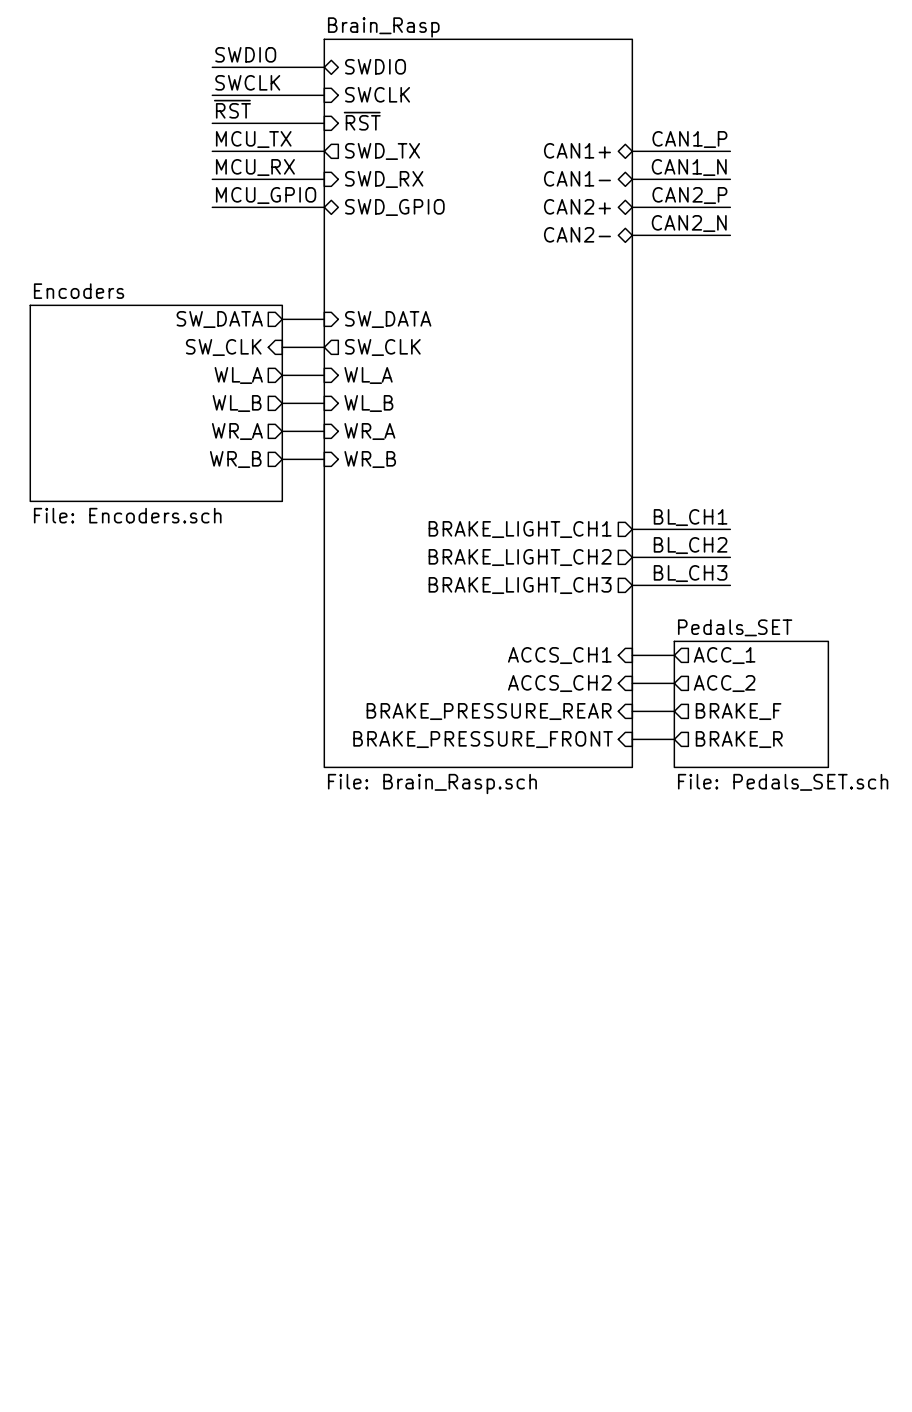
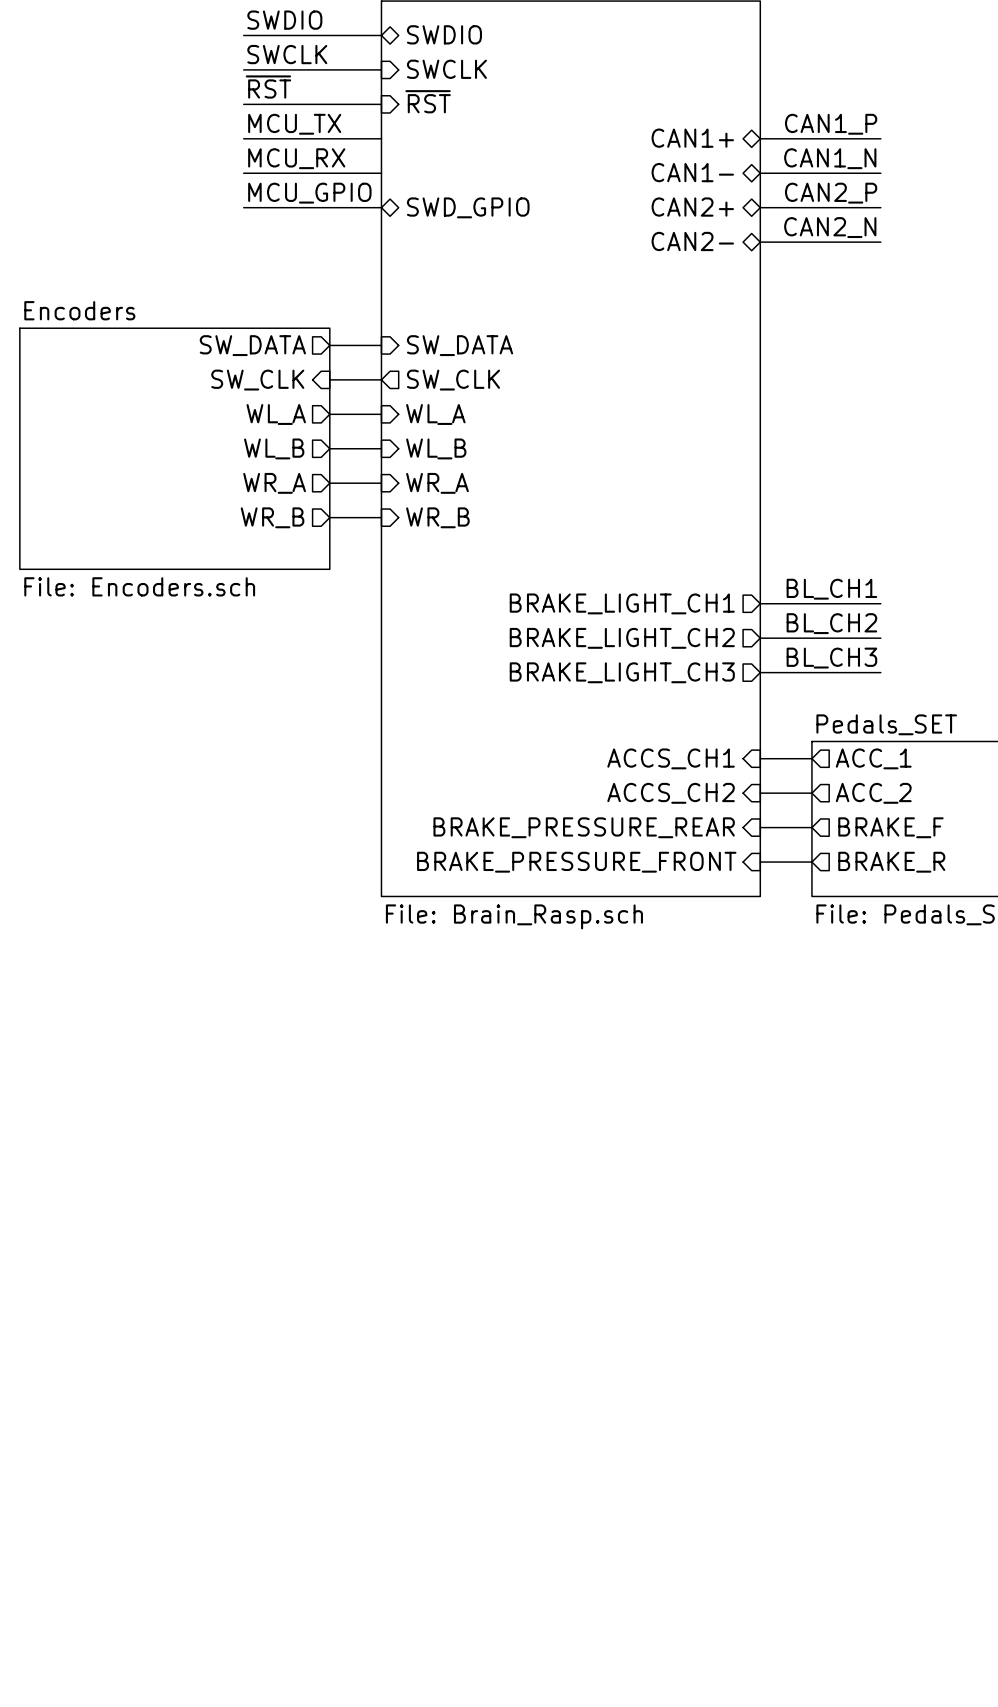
sheet pin: SWD_TX (382, 151) -> none
sheet pin: SWD_RX (384, 179) -> none

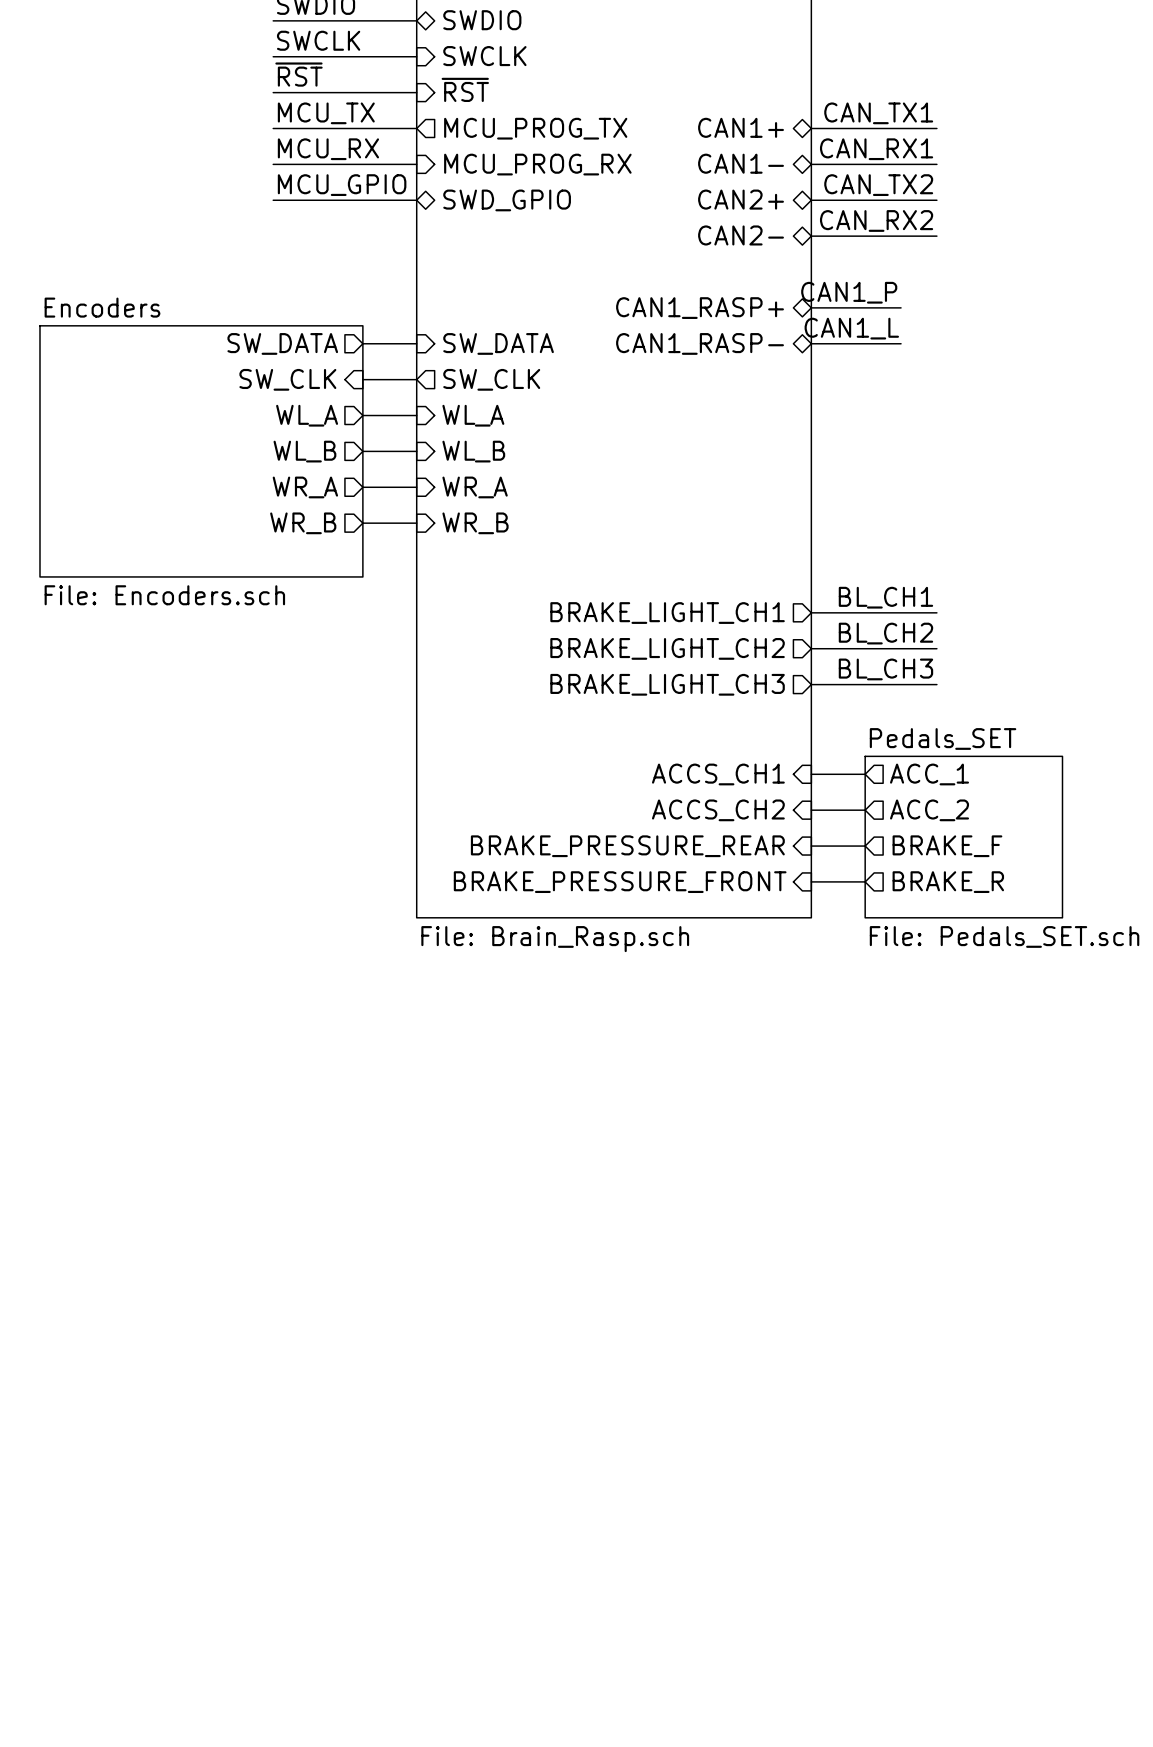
label: CAN1_P (831, 124) -> CAN_TX1 (878, 113)
sheet pin: none -> MCU_PROG_TX (535, 128)
label: CAN1_N (830, 158) -> CAN_RX1 (876, 149)
sheet pin: none -> MCU_PROG_RX (537, 164)
label: CAN2_P (831, 193) -> CAN_TX2 (878, 185)
label: CAN2_N (830, 227) -> CAN_RX2 (876, 220)
label: none -> CAN1_P (849, 292)
sheet pin: none -> CAN1_RASP+ (700, 308)
wire: none -> (811, 307) (901, 307)
label: none -> CAN1_L (851, 328)
sheet pin: none -> CAN1_RASP- (700, 343)
wire: none -> (811, 343) (901, 343)

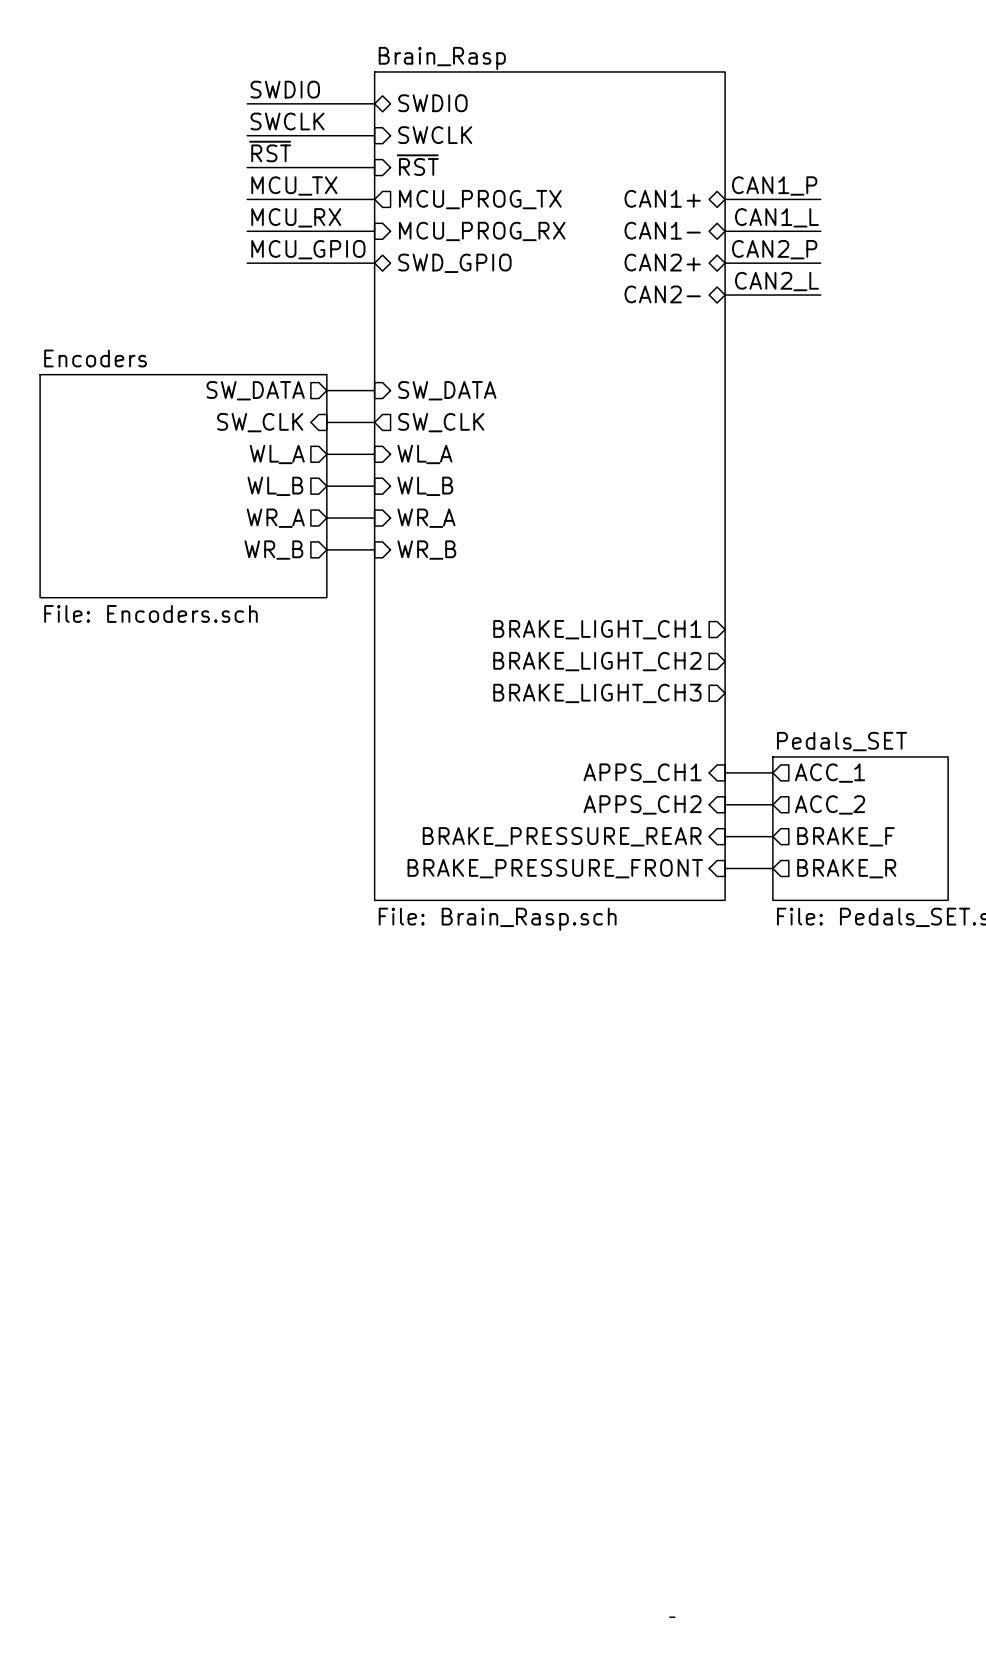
label: CAN_TX1 (878, 113) -> none
wire: (918, 128) (936, 128) -> none
label: CAN_RX1 (876, 149) -> none
wire: (918, 164) (936, 164) -> none
label: CAN_TX2 (878, 185) -> CAN2_P (774, 249)
wire: (918, 200) (936, 200) -> none
label: CAN_RX2 (876, 220) -> CAN2_L (776, 281)
wire: (918, 236) (936, 236) -> none
label position: CAN1_P (849, 292) -> CAN1_P (774, 185)
wire: (811, 307) (901, 307) -> none
sheet pin: CAN1_RASP+ (700, 308) -> none
label position: CAN1_L (851, 328) -> CAN1_L (776, 217)
sheet pin: CAN1_RASP- (700, 343) -> none
wire: (811, 343) (901, 343) -> none
label: BL_CH1 (885, 597) -> none
wire: (811, 612) (936, 612) -> none
label: BL_CH2 (885, 633) -> none
wire: (811, 648) (936, 648) -> none
label: BL_CH3 (885, 669) -> none
wire: (811, 684) (936, 684) -> none
sheet pin: ACCS_CH1 (718, 774) -> APPS_CH1 (642, 773)
sheet pin: ACCS_CH2 (718, 810) -> APPS_CH2 (642, 804)
line: none -> (669, 1617) (677, 1617)

